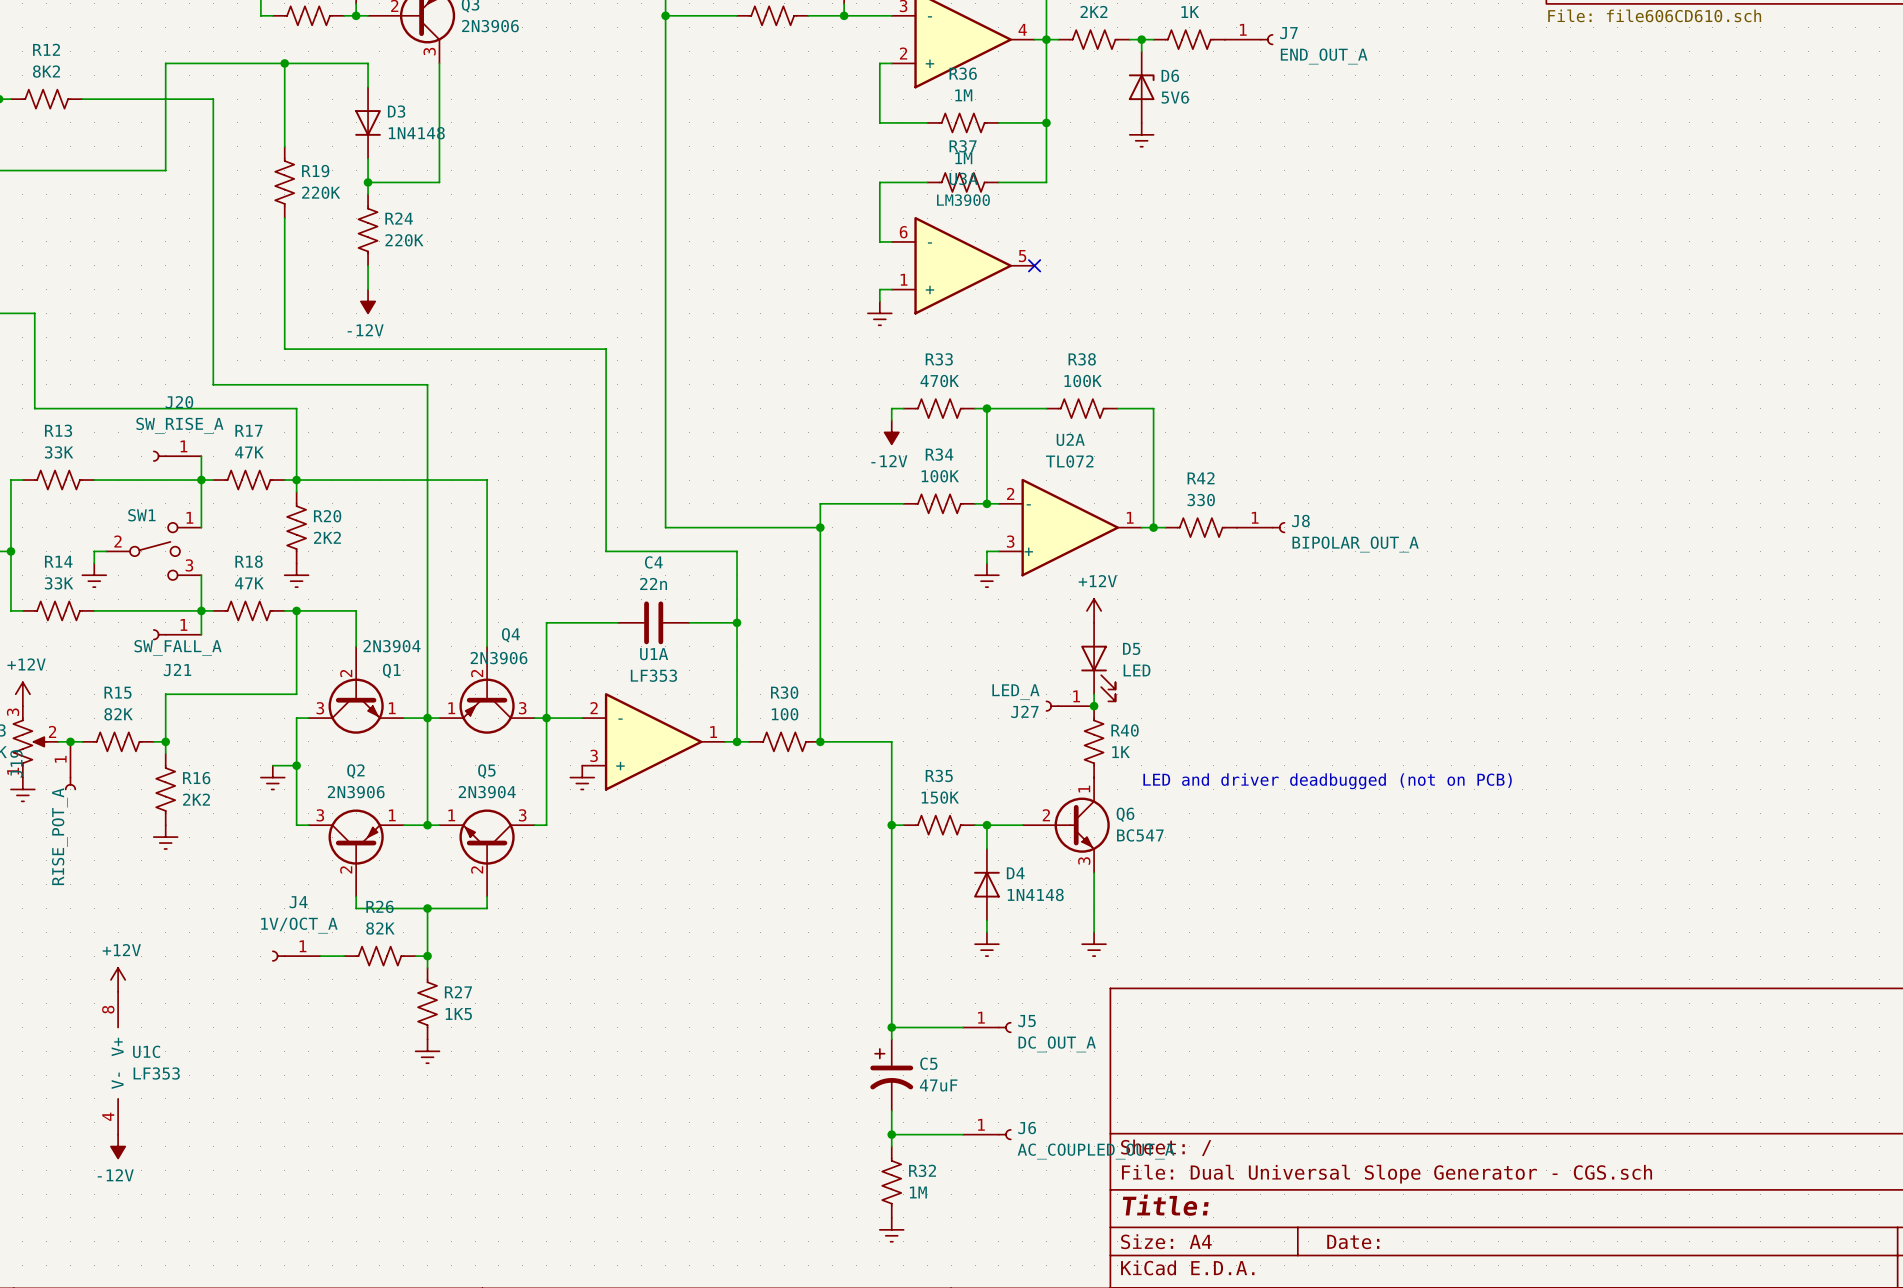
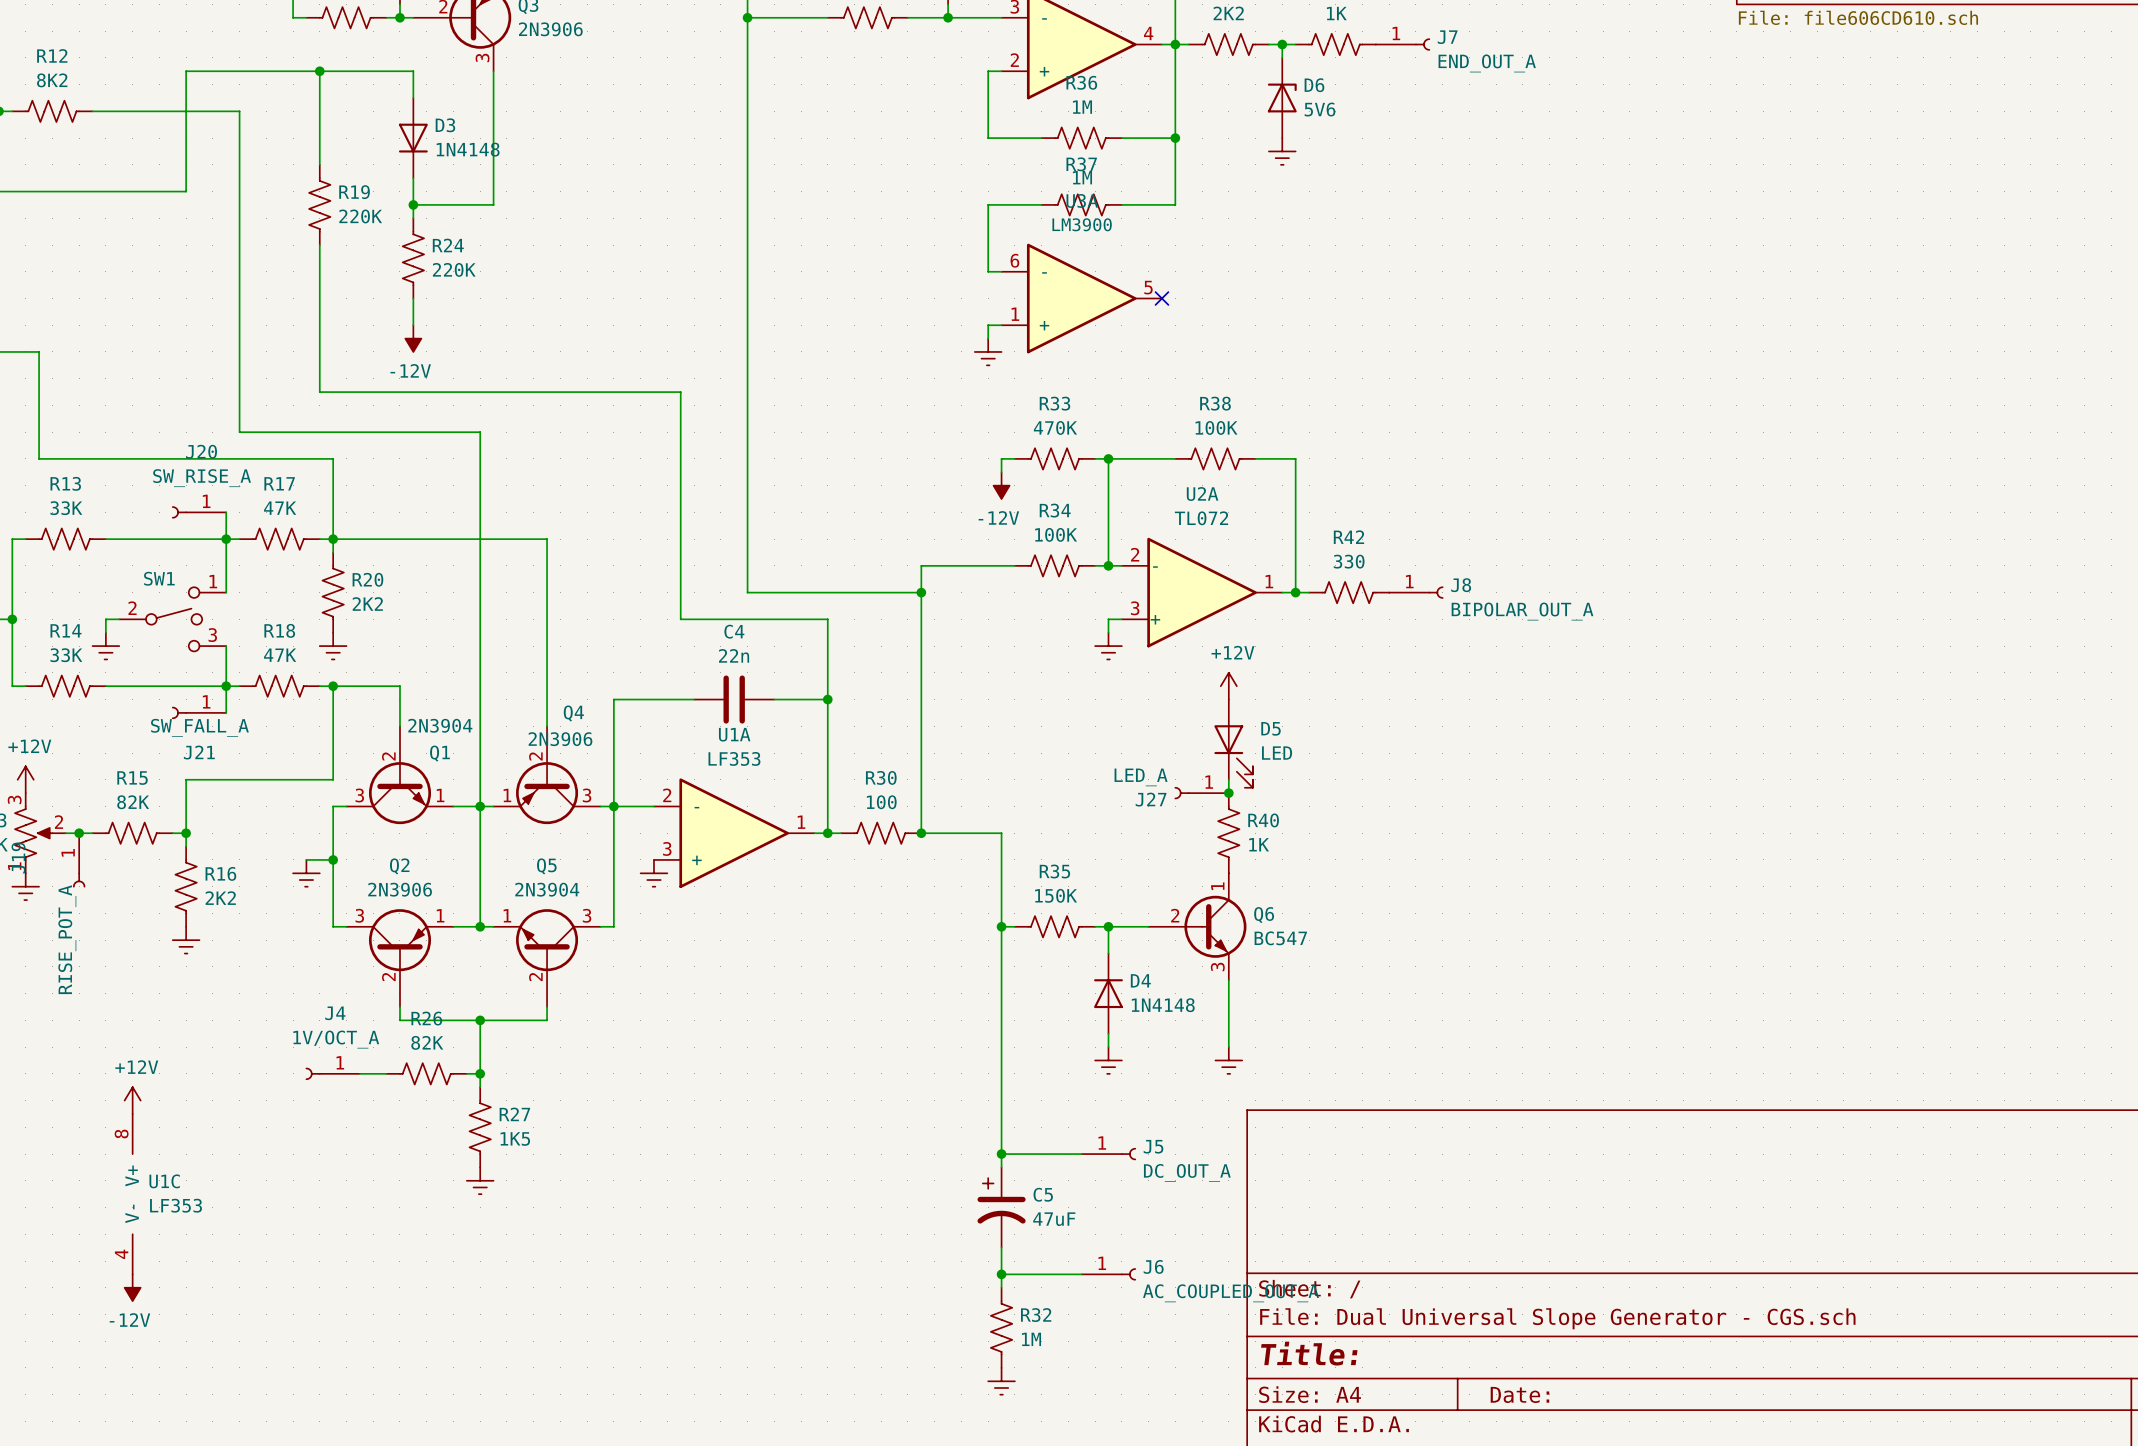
text: LED and driver deadbugged (not on PCB) (1327, 781) -> none

